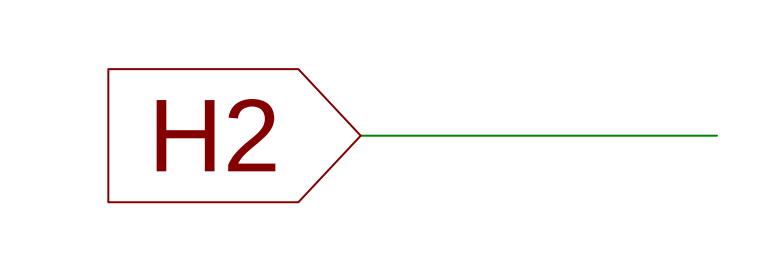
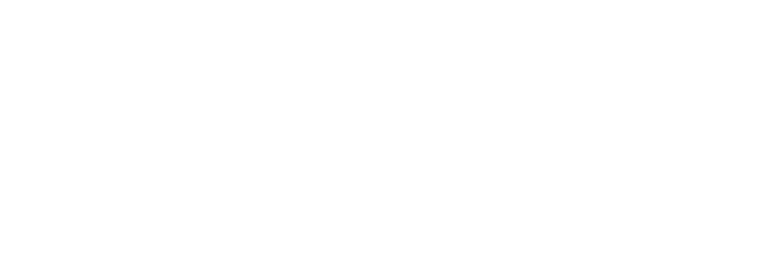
global label: H2 (216, 135) -> none
wire: (360, 135) (717, 135) -> none

